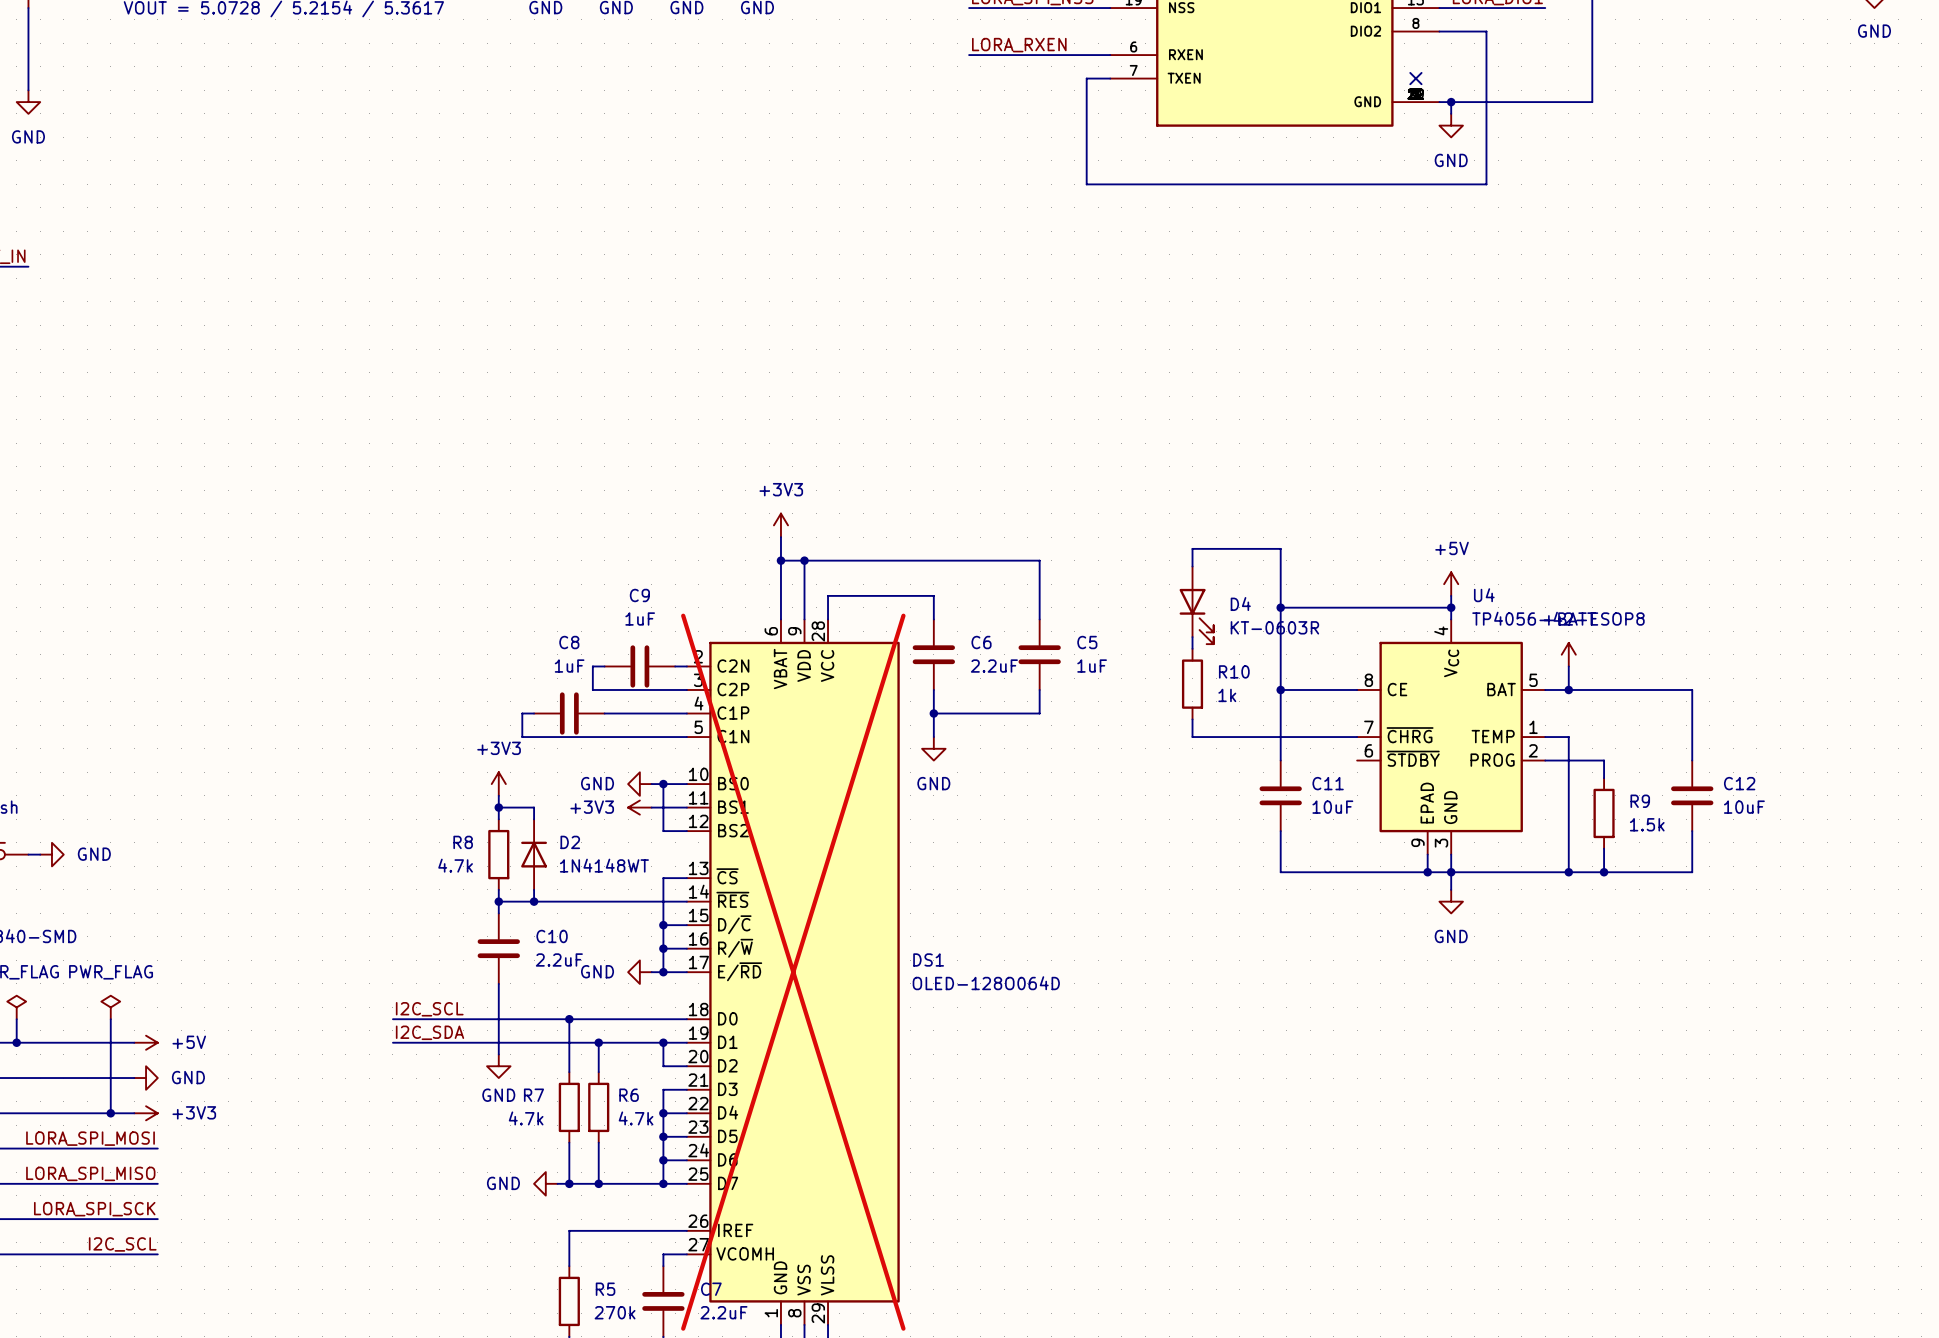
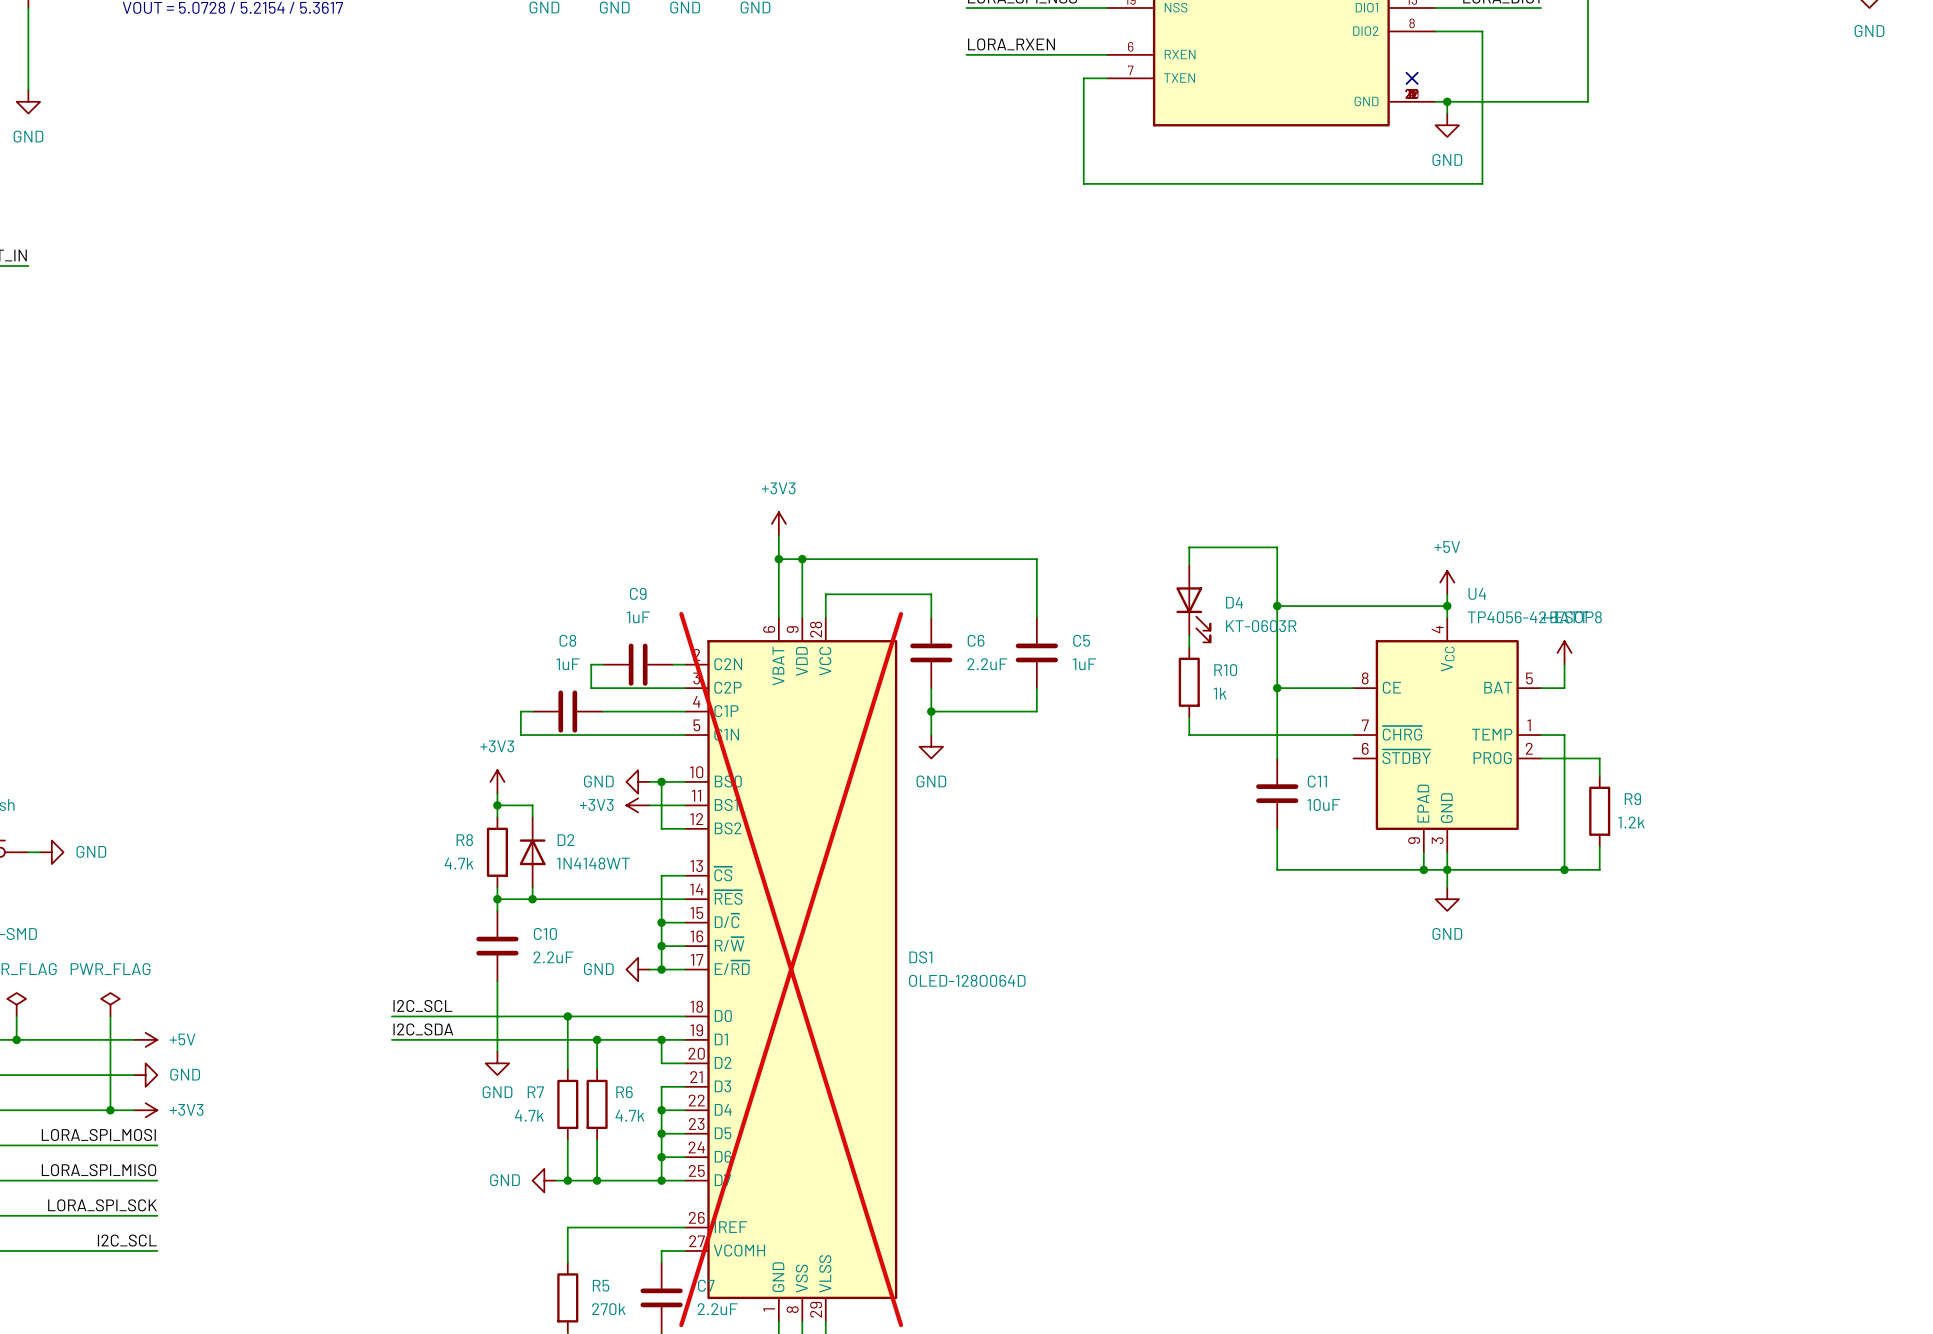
wire: (1568, 689) (1692, 689) (1692, 760) -> none
junction: (1568, 689) -> none
C12: 10uF (1692, 795) -> none
R9 value: 1.5k (1647, 824) -> 1.2k (1631, 822)
wire: (1692, 831) (1692, 872) (1604, 872) -> none
junction: (1604, 872) -> none

